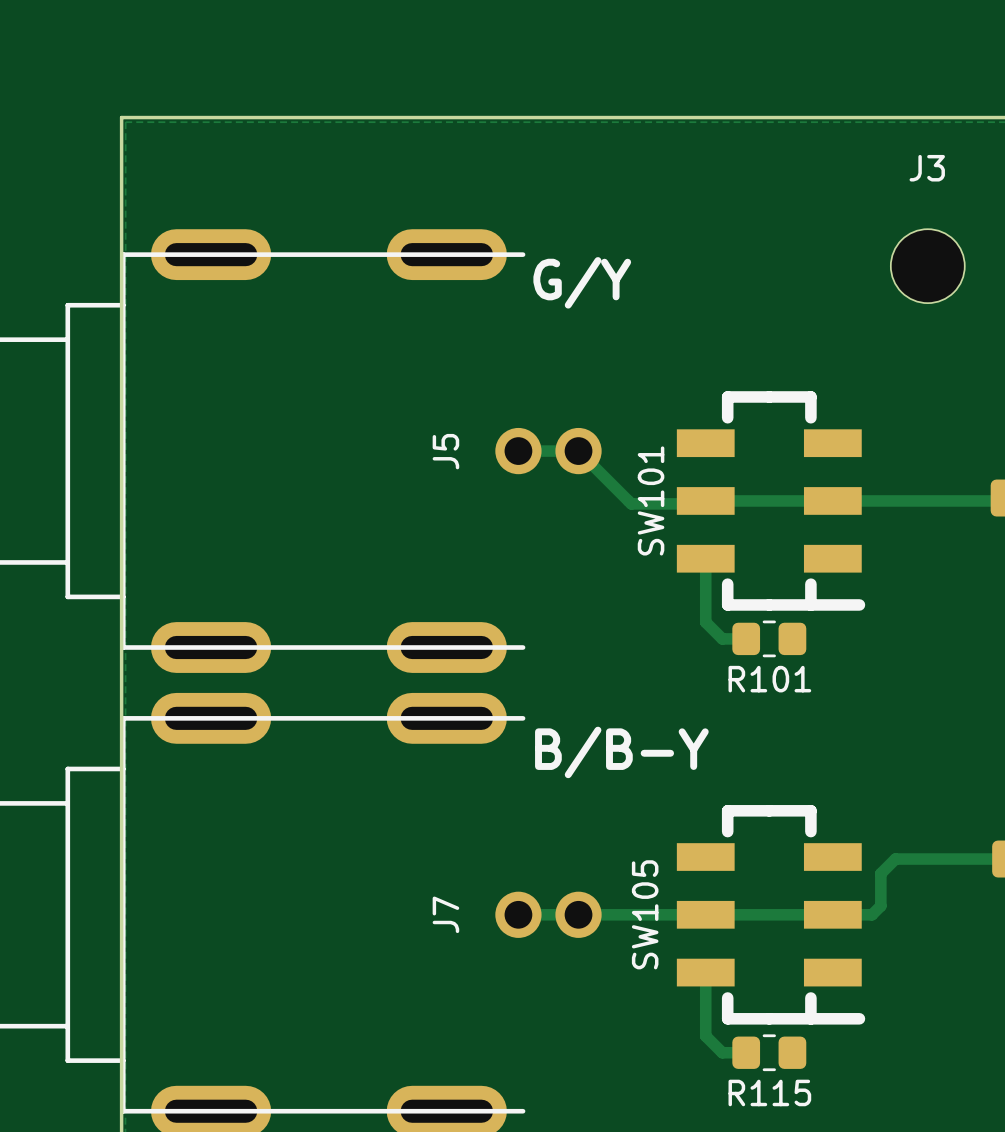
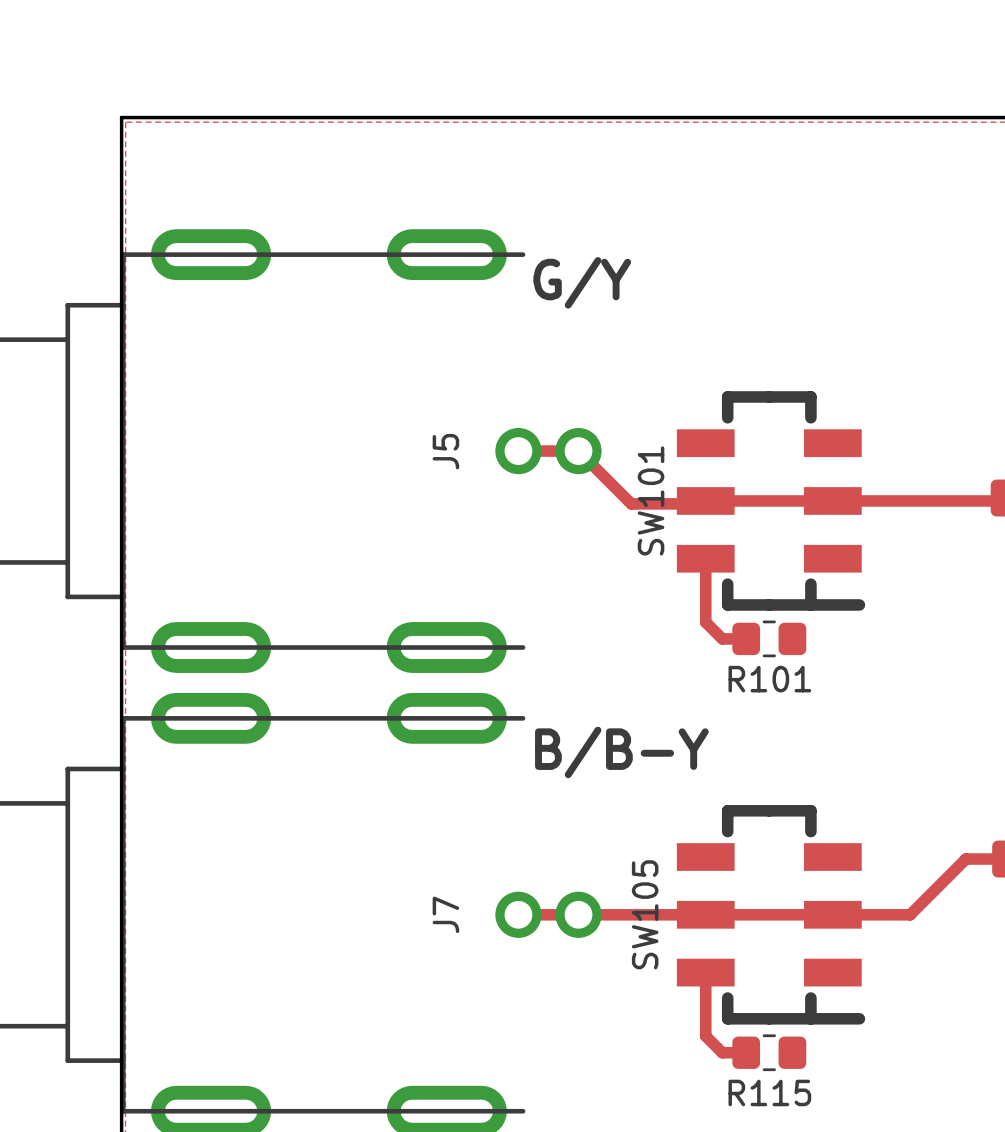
J3: (927, 266) -> none
track: (965, 859) (895, 859) (880, 873) (880, 905) (872, 914) -> (965, 859) (910, 914) (872, 914)

